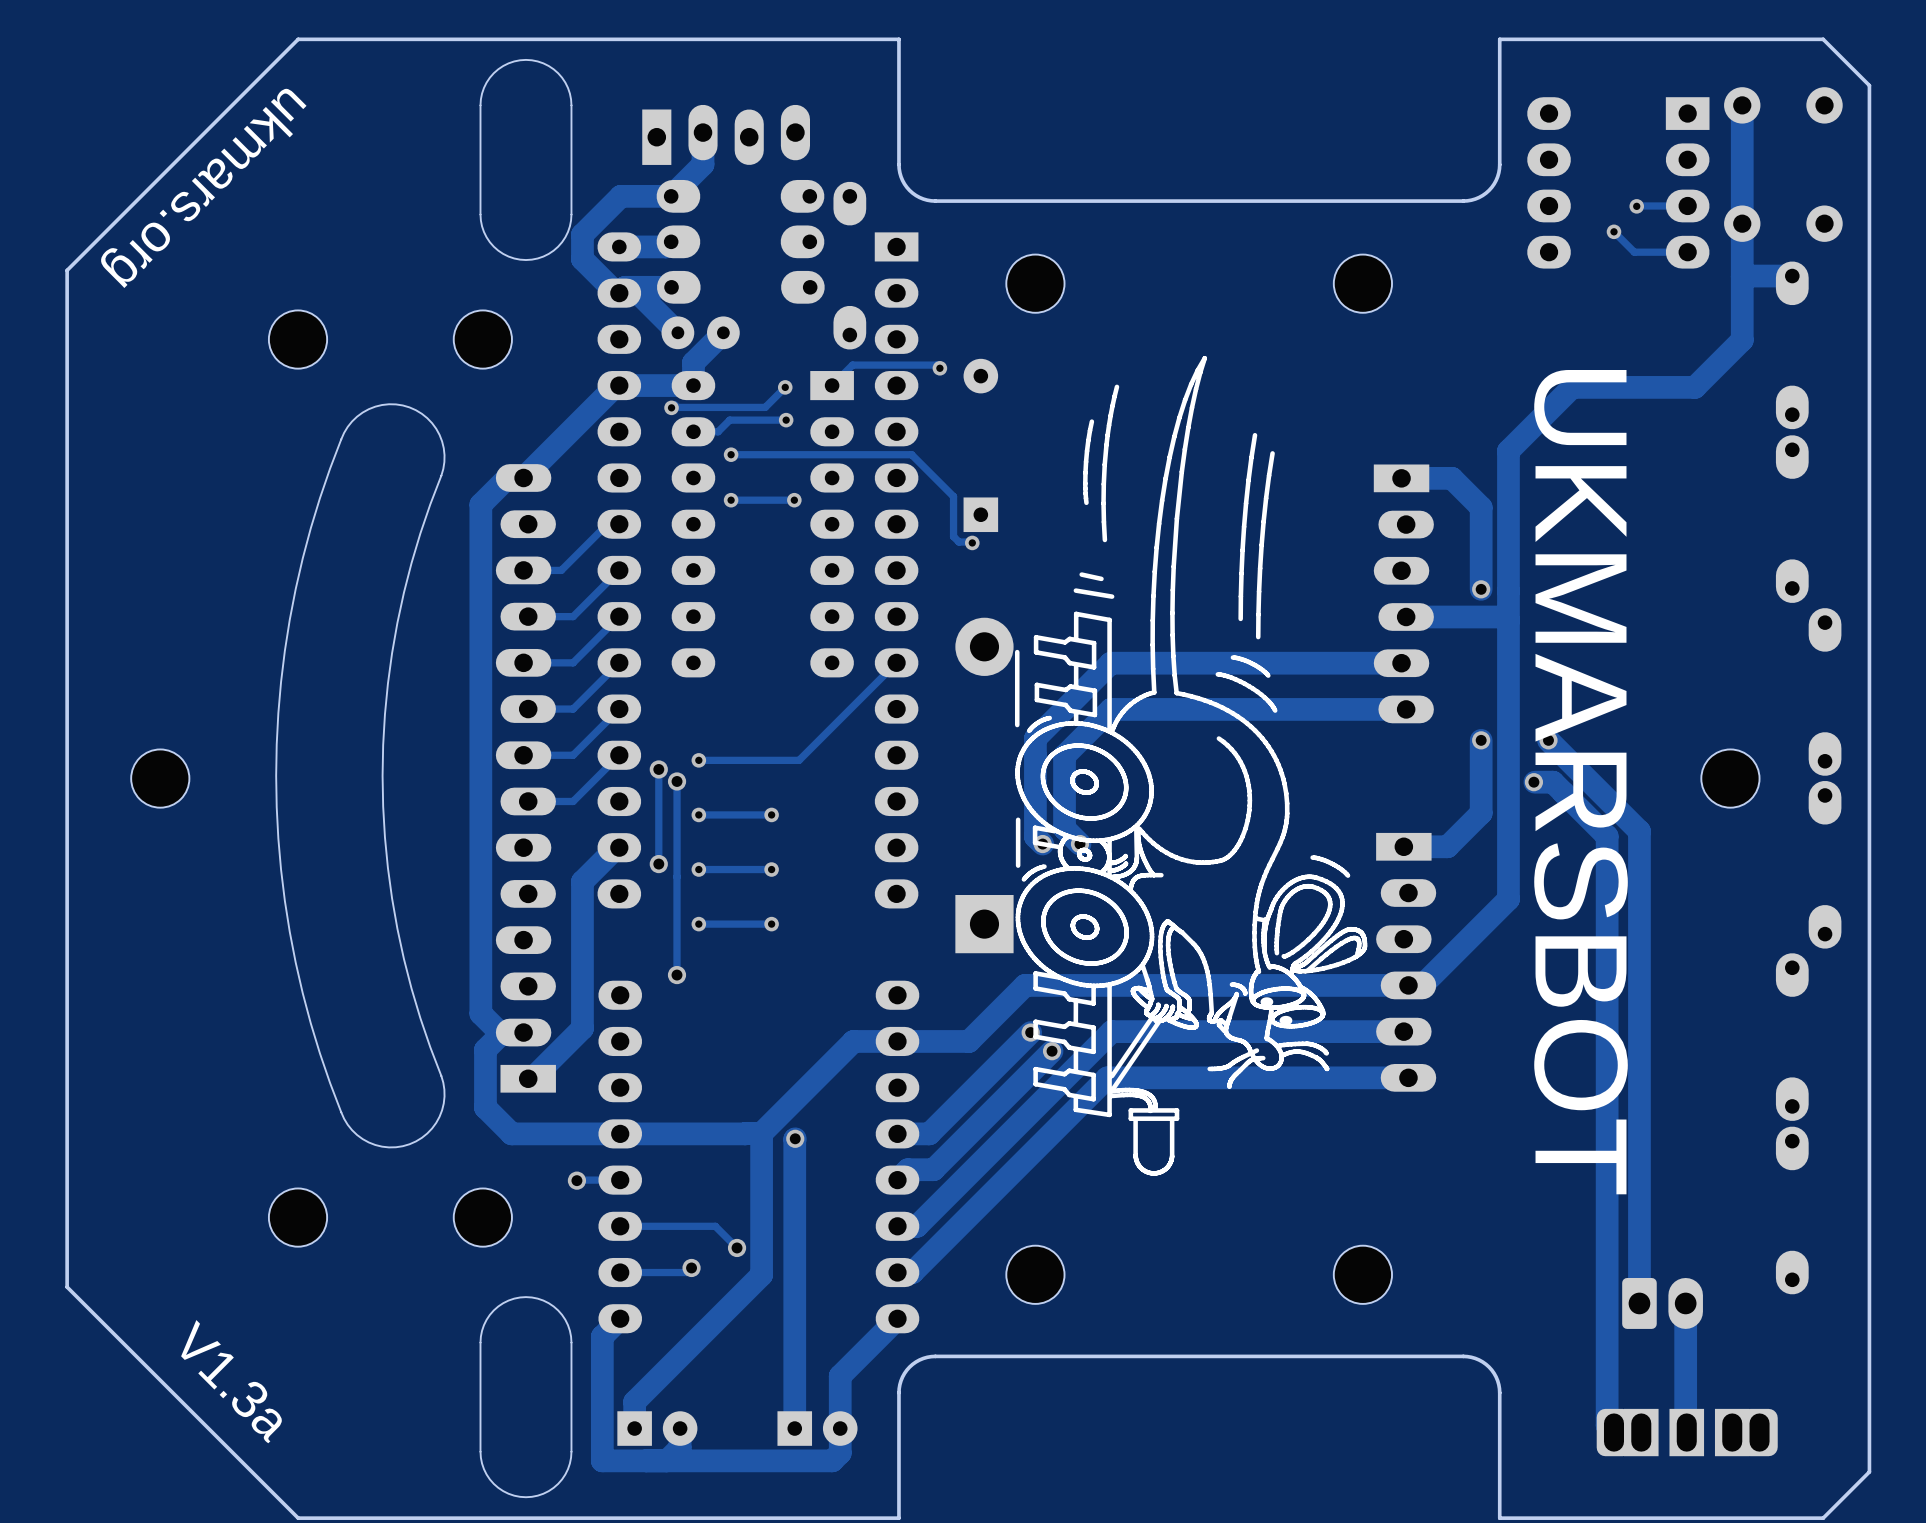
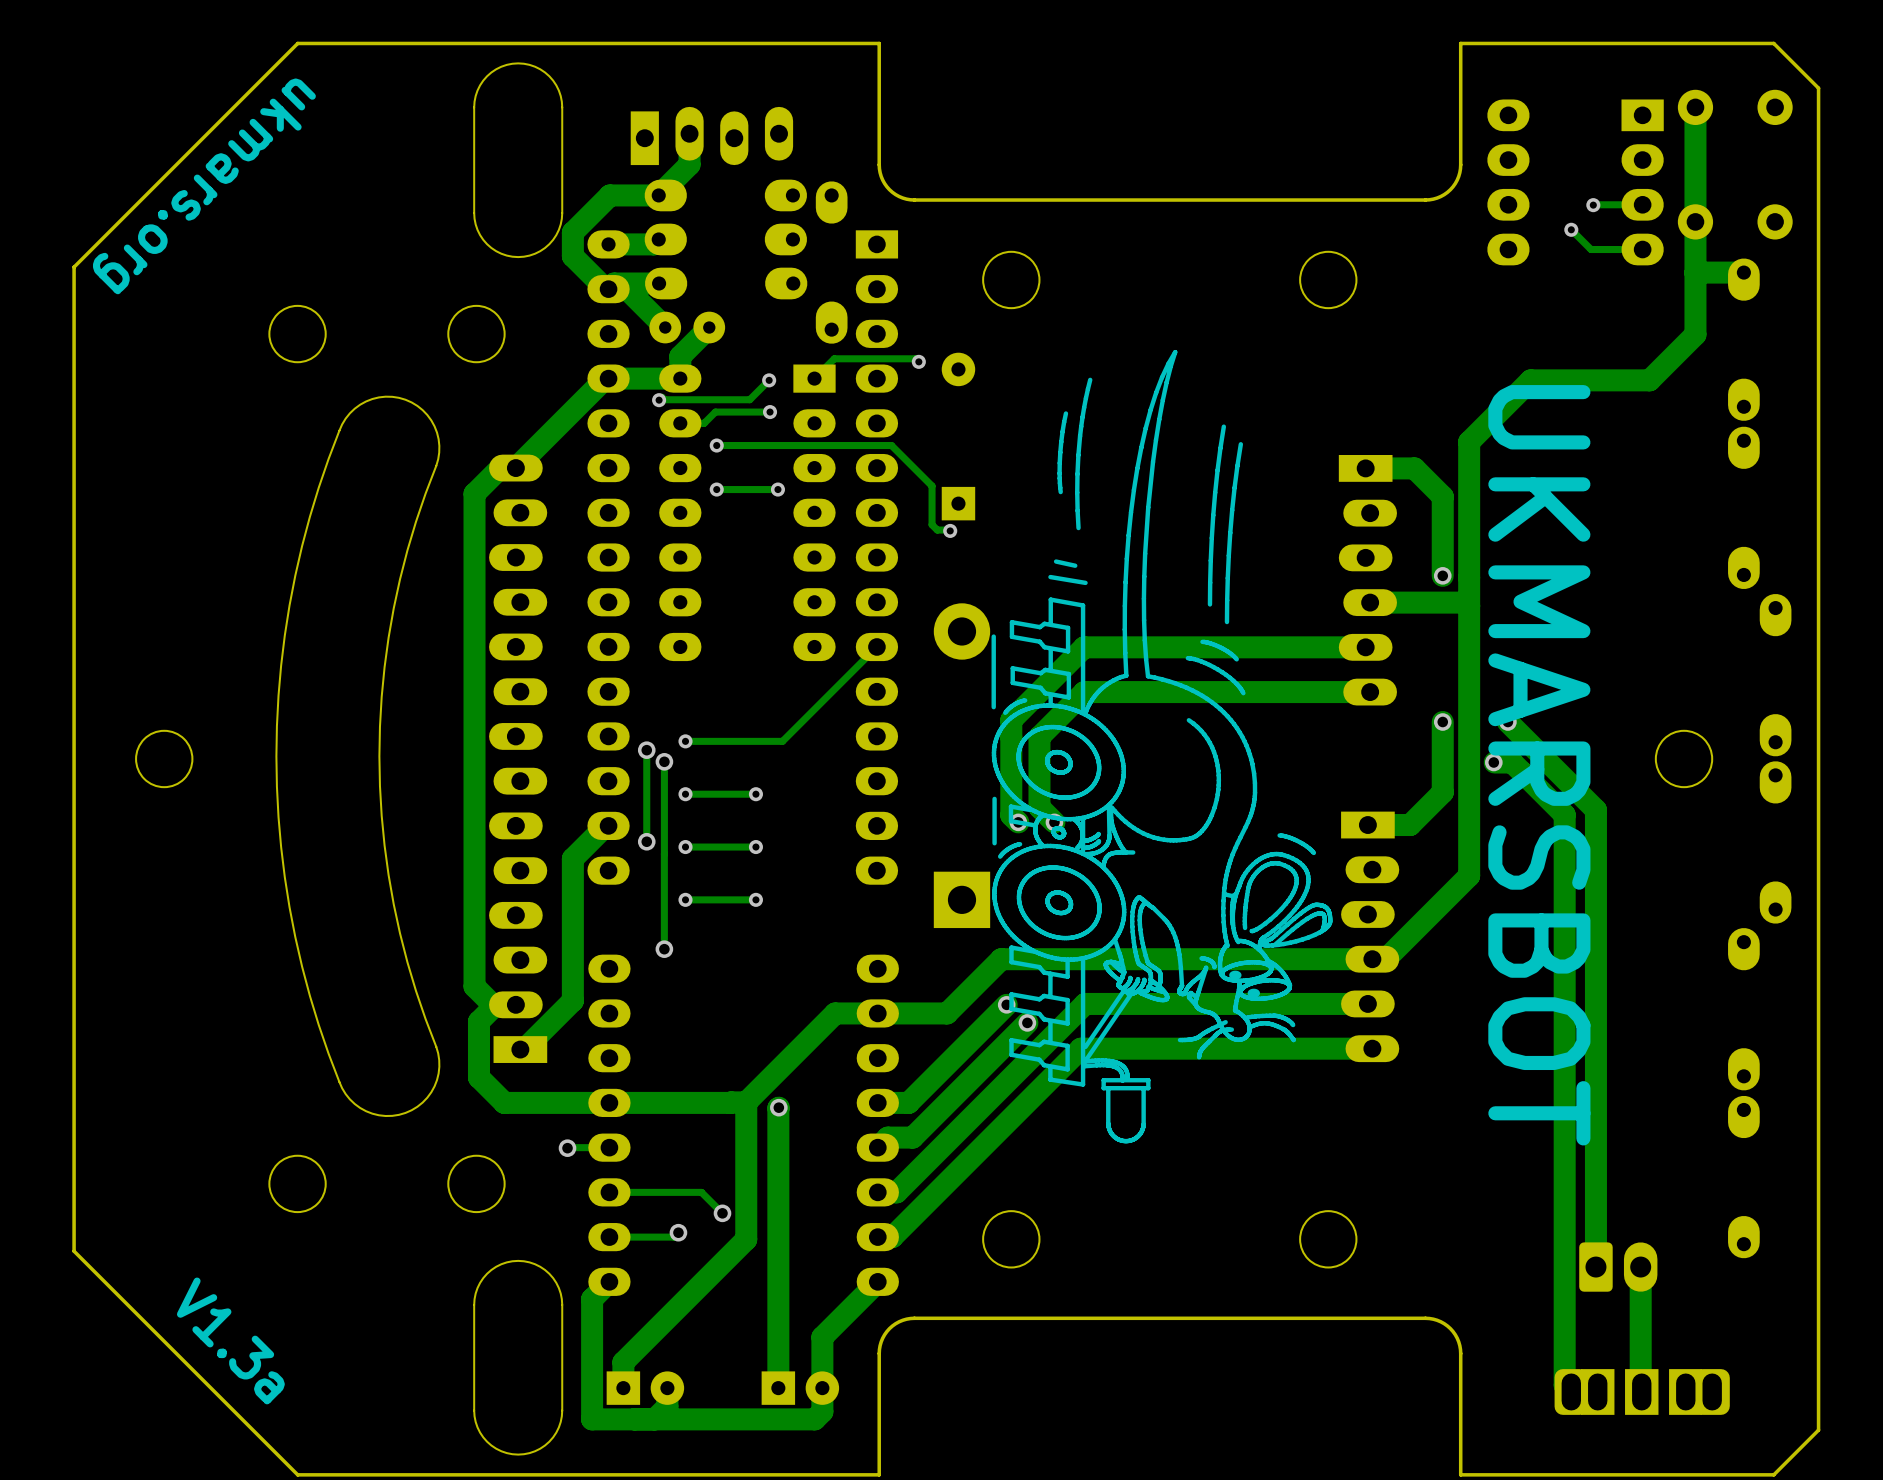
track: (619, 524) (607, 524) (561, 570) (523, 570) -> none
track: (619, 570) (573, 616) (528, 616) -> none
track: (619, 616) (573, 662) (523, 662) -> none
track: (619, 662) (573, 709) (528, 709) -> none
track: (619, 709) (573, 755) (523, 755) -> none
track: (619, 755) (573, 801) (528, 801) -> none

